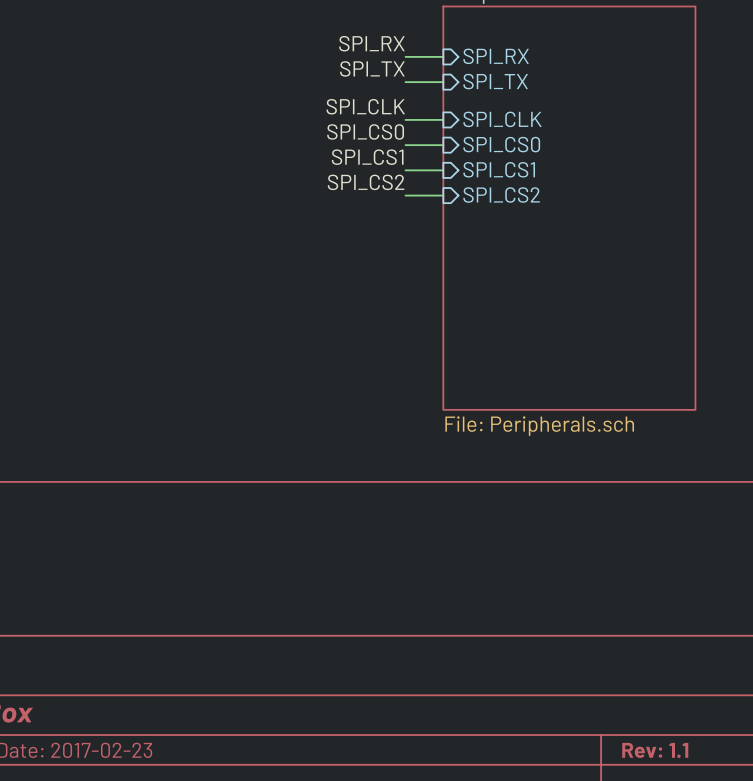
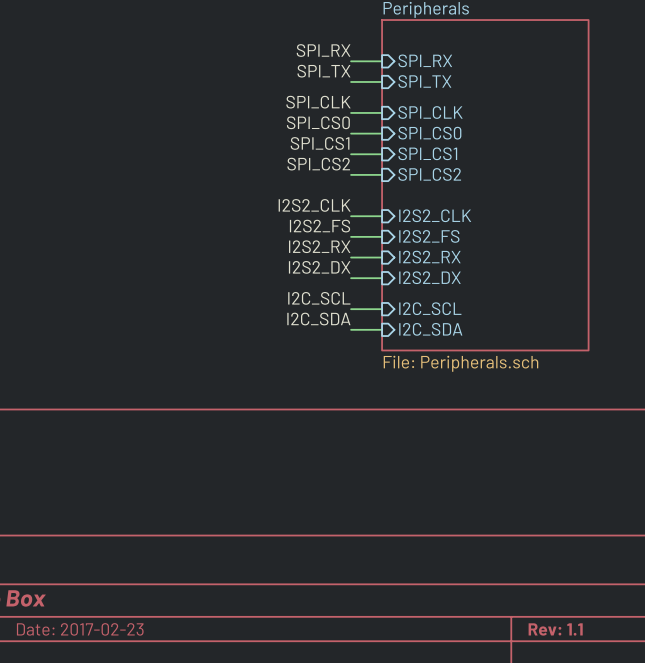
label: none -> I2S2_CLK (314, 205)
wire: none -> (351, 216) (382, 216)
sheet pin: none -> I2S2_CLK (435, 215)
label: none -> I2S2_FS (320, 226)
sheet pin: none -> I2S2_FS (429, 236)
wire: none -> (351, 236) (382, 236)
label: none -> I2S2_RX (319, 246)
sheet pin: none -> I2S2_RX (429, 257)
wire: none -> (351, 257) (382, 257)
label: none -> I2S2_DX (319, 267)
wire: none -> (351, 278) (382, 278)
sheet pin: none -> I2S2_DX (429, 277)
label: none -> I2C_SCL (319, 298)
sheet pin: none -> I2C_SCL (430, 308)
wire: none -> (351, 309) (382, 309)
label: none -> I2C_SDA (318, 319)
wire: none -> (351, 329) (382, 329)
sheet pin: none -> I2C_SDA (430, 329)

